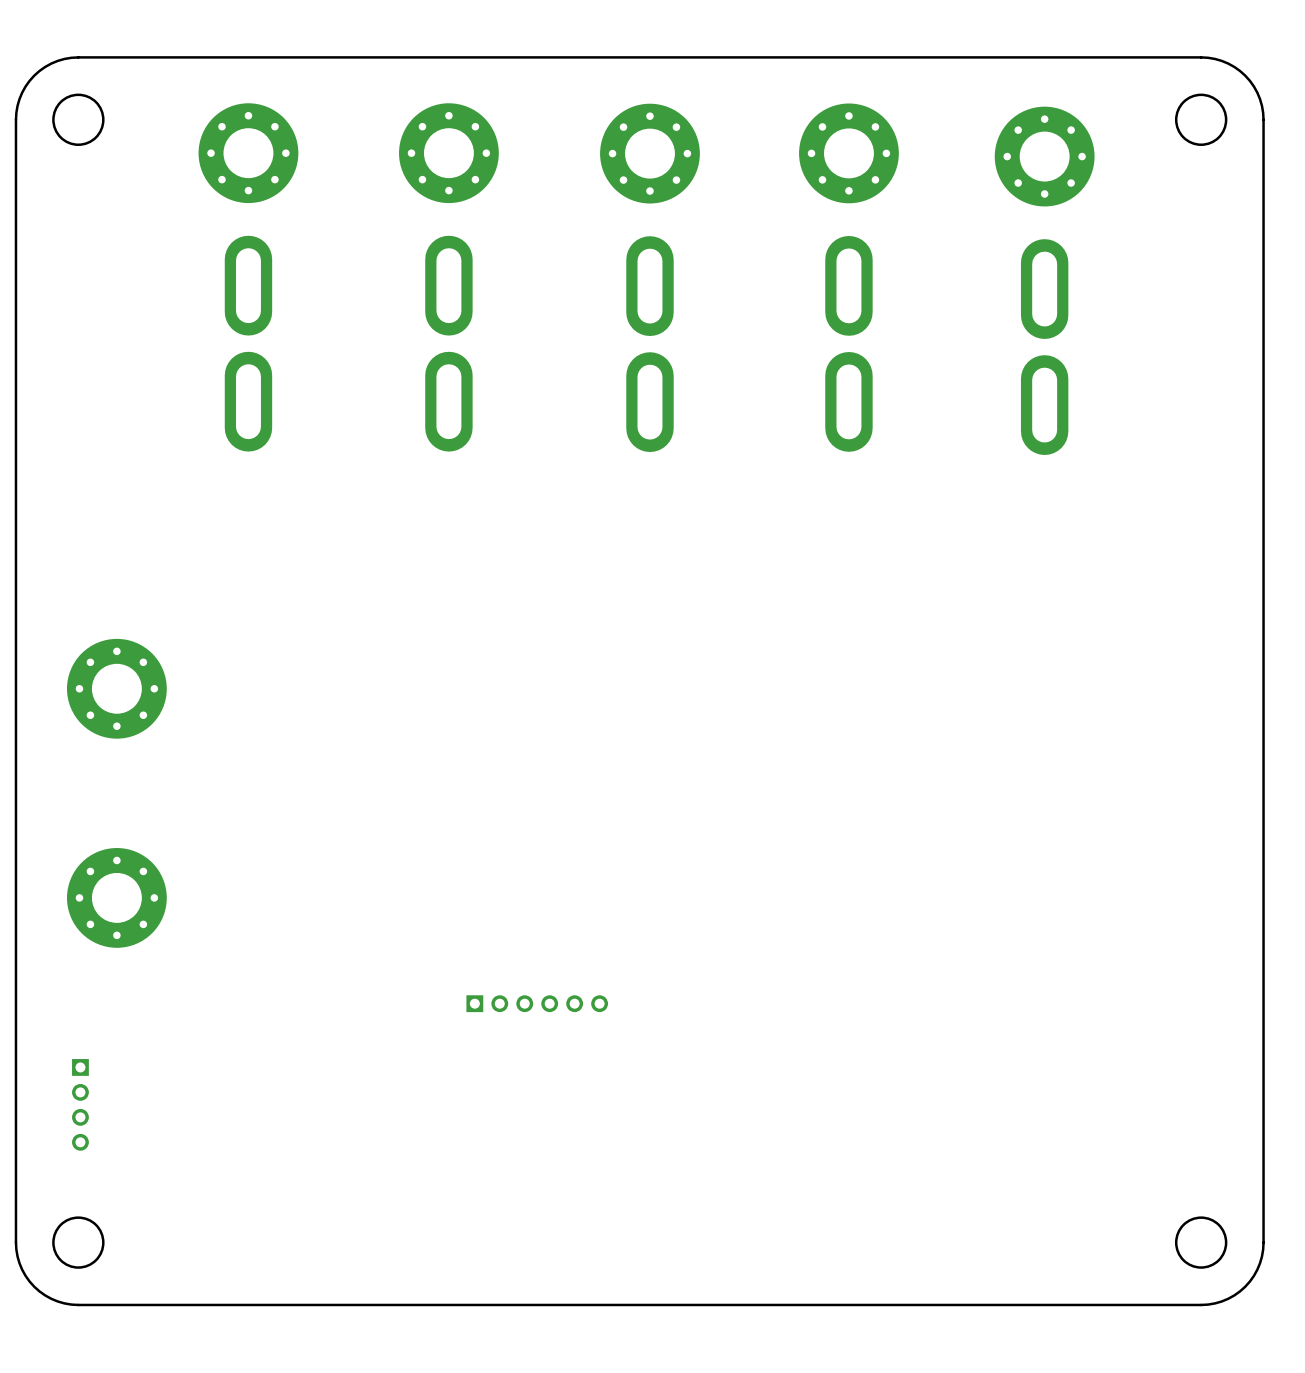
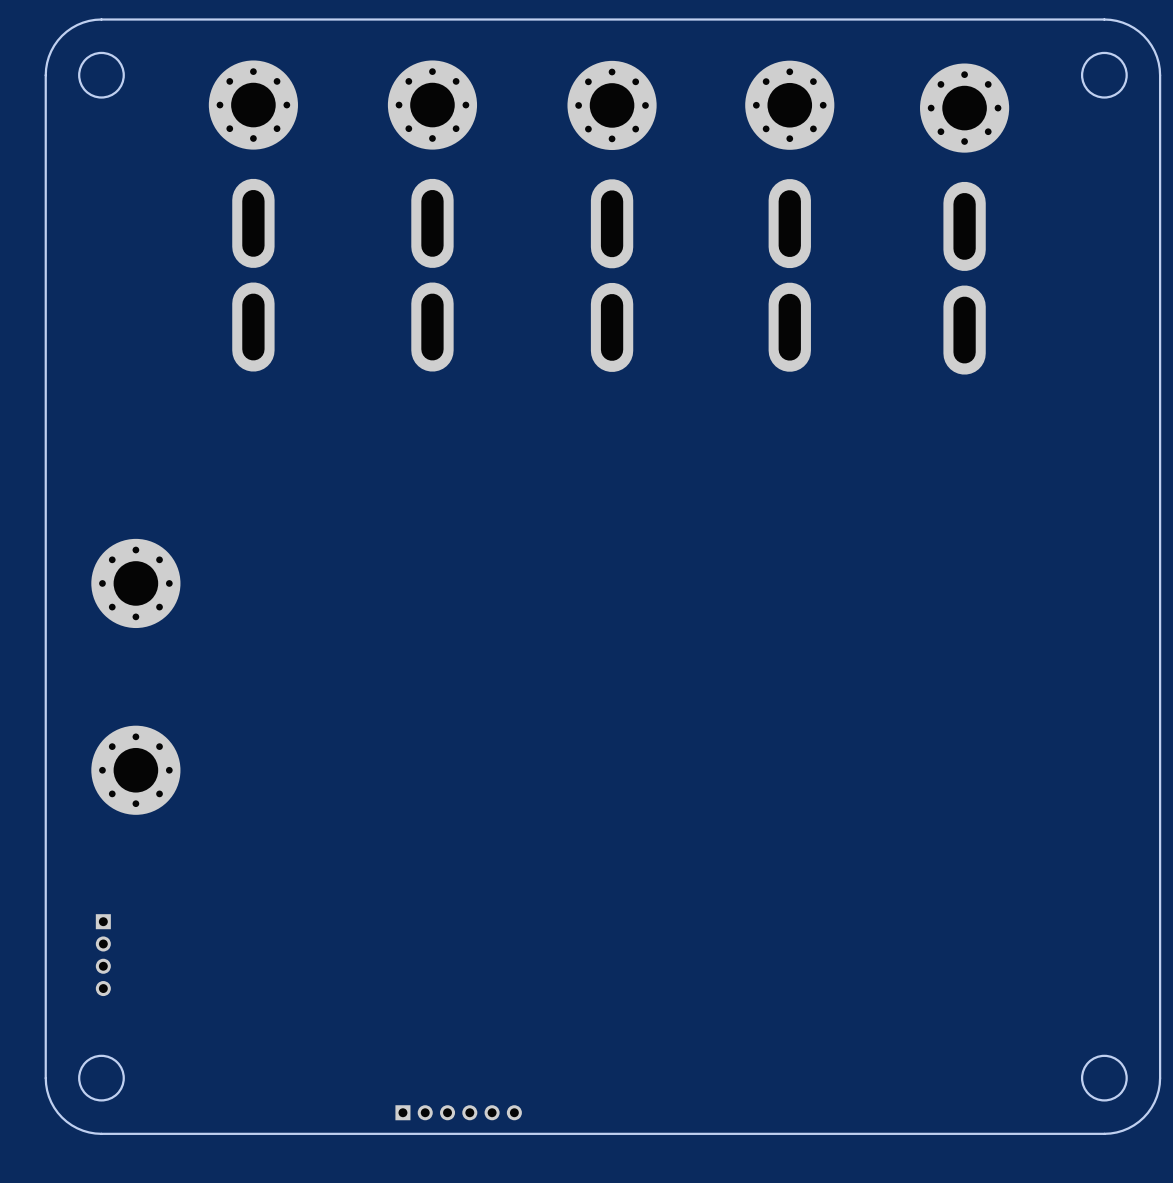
part position: (537, 1003) -> (458, 1112)

